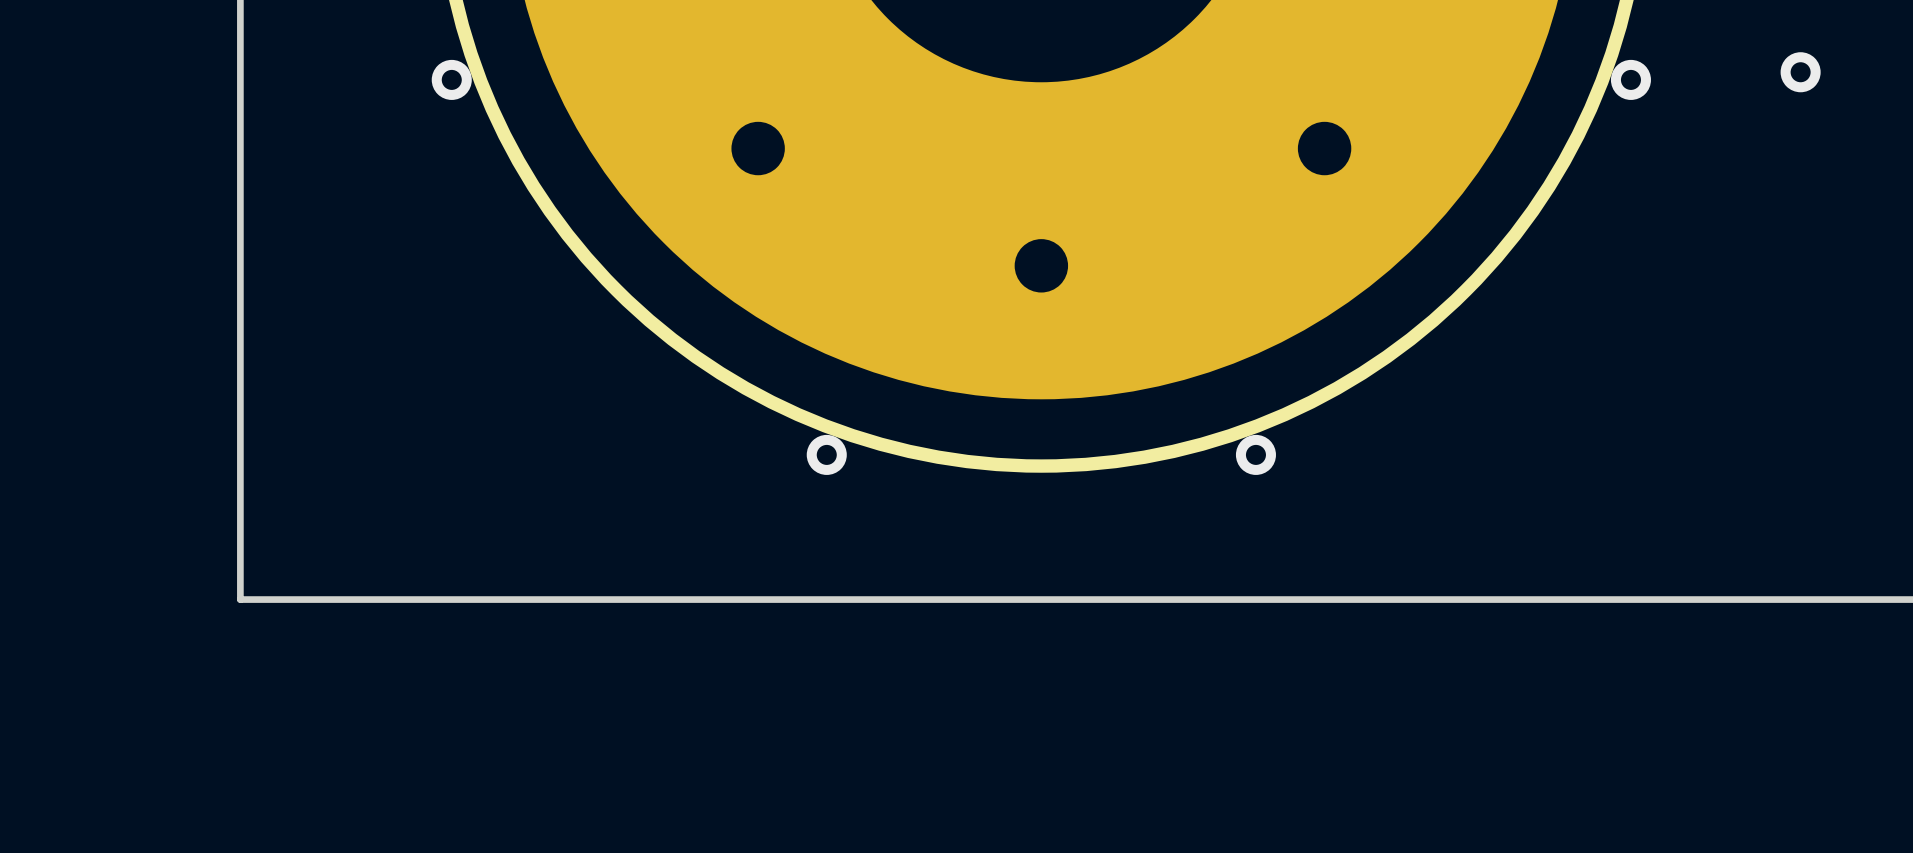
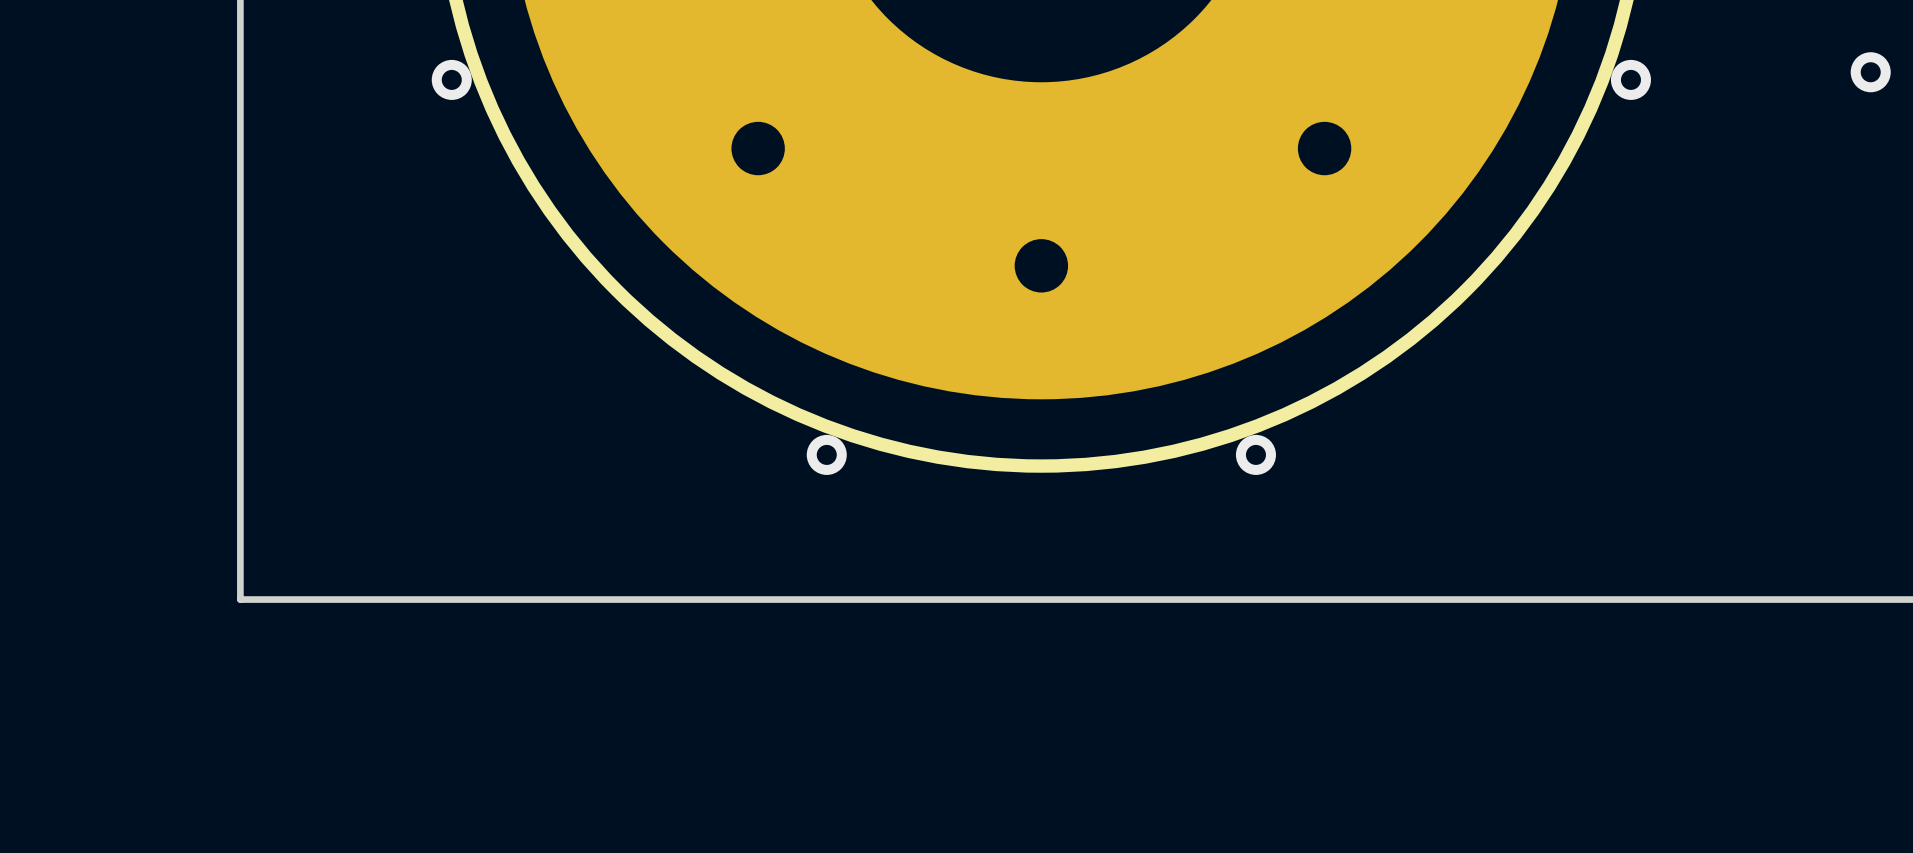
via position: (1800, 72) -> (1870, 72)

